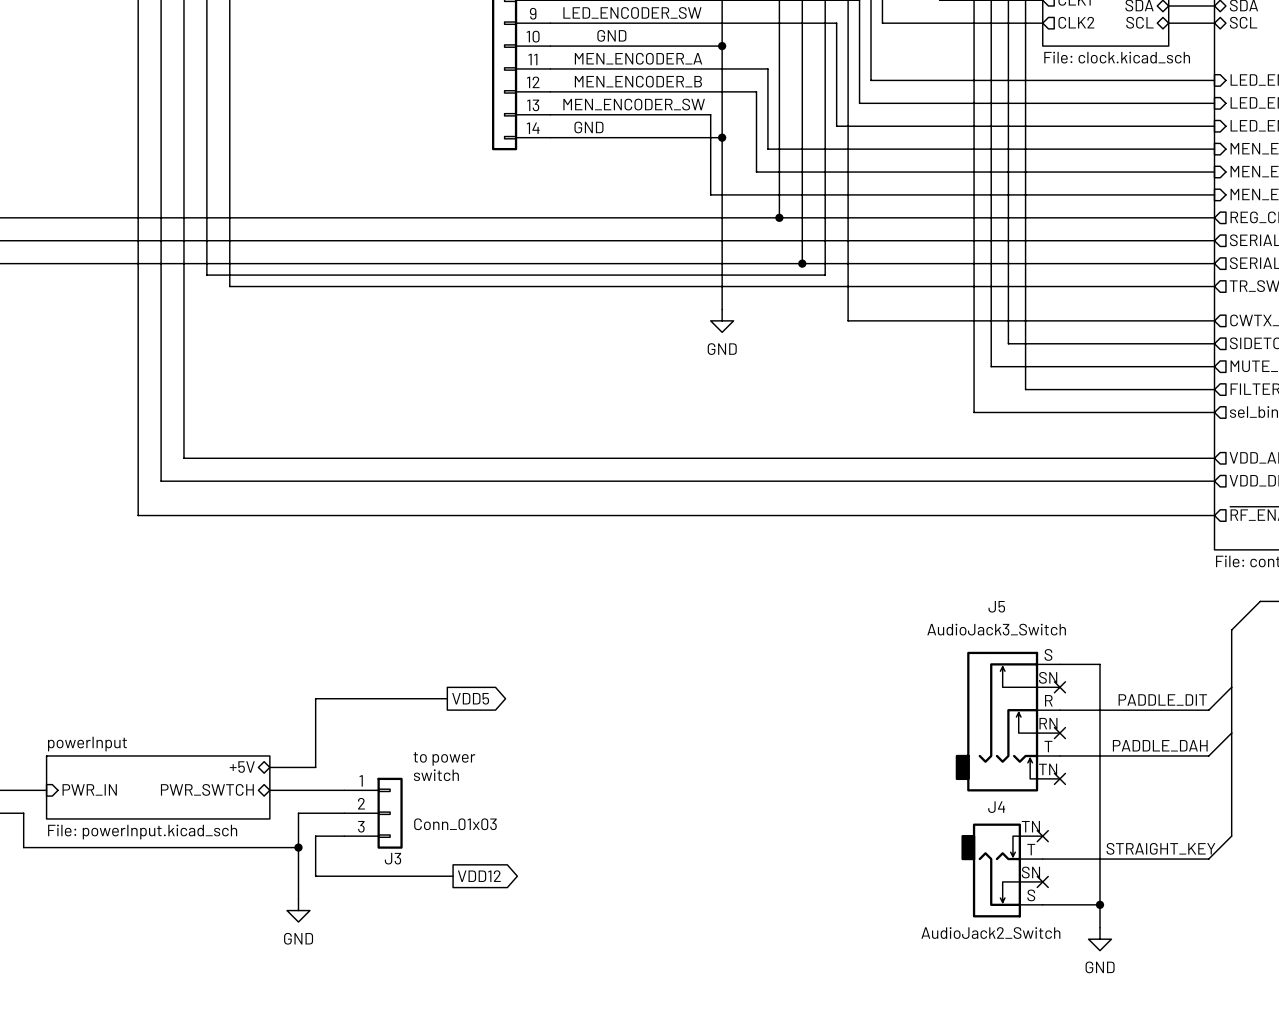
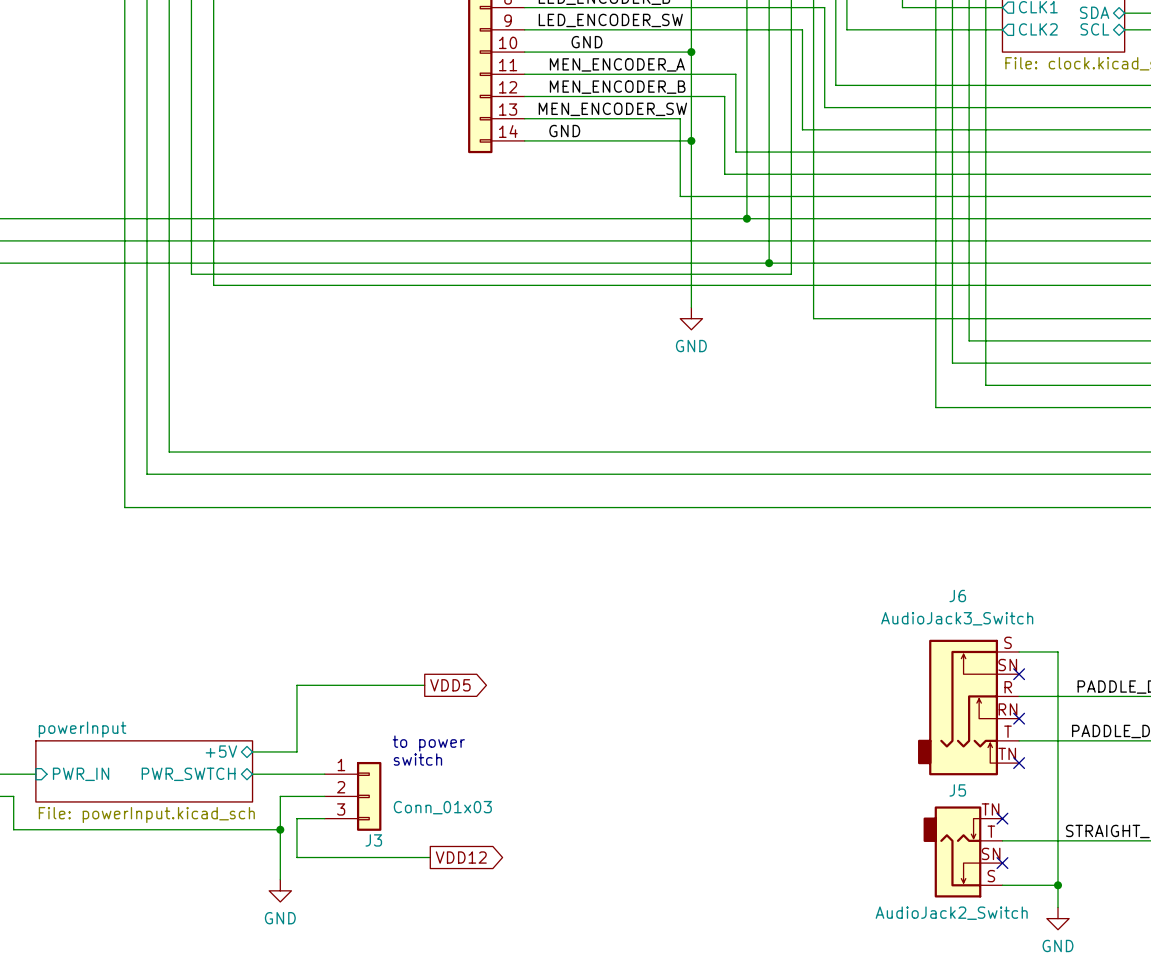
J5 name: J5 (996, 606) -> J6 (957, 596)
J4 name: J4 (996, 807) -> J5 (957, 790)

